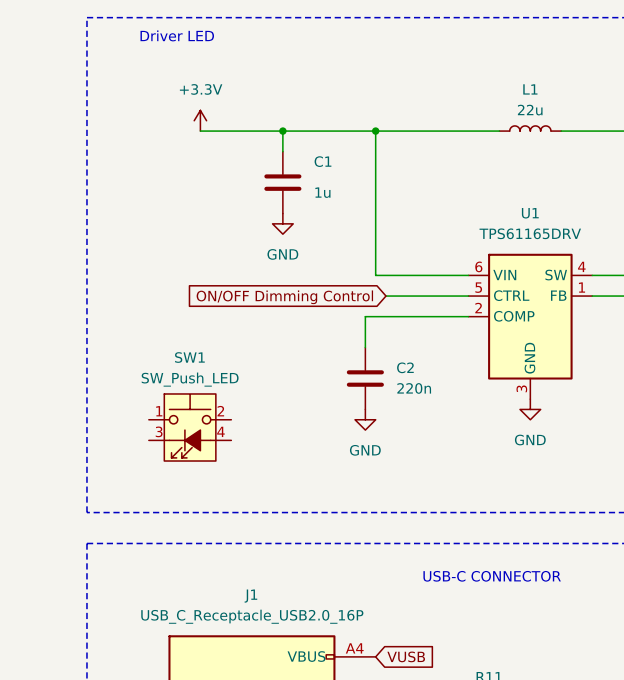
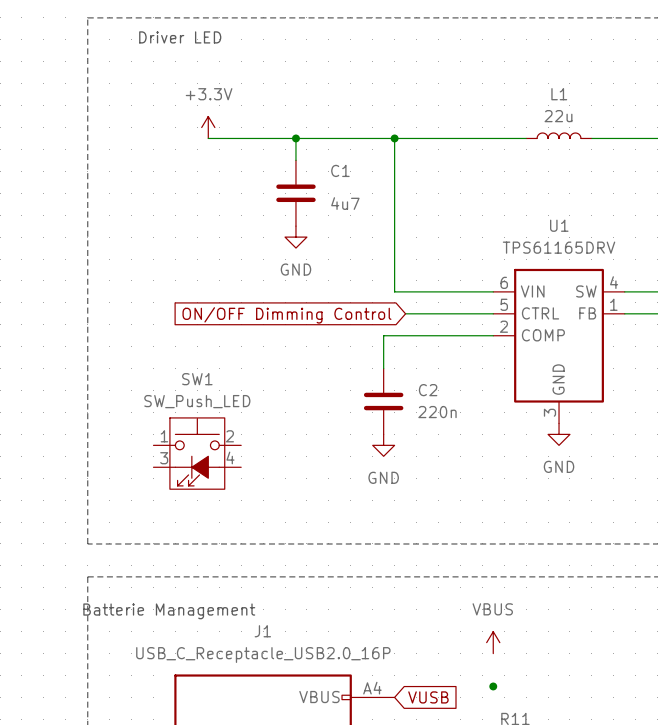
C1 value: 1u (322, 192) -> 4u7 (345, 203)
text: none -> Batterie Management (169, 611)
text: USB-C CONNECTOR (492, 576) -> none
power symbol: none -> VBUS (493, 642)
junction: none -> (493, 686)

